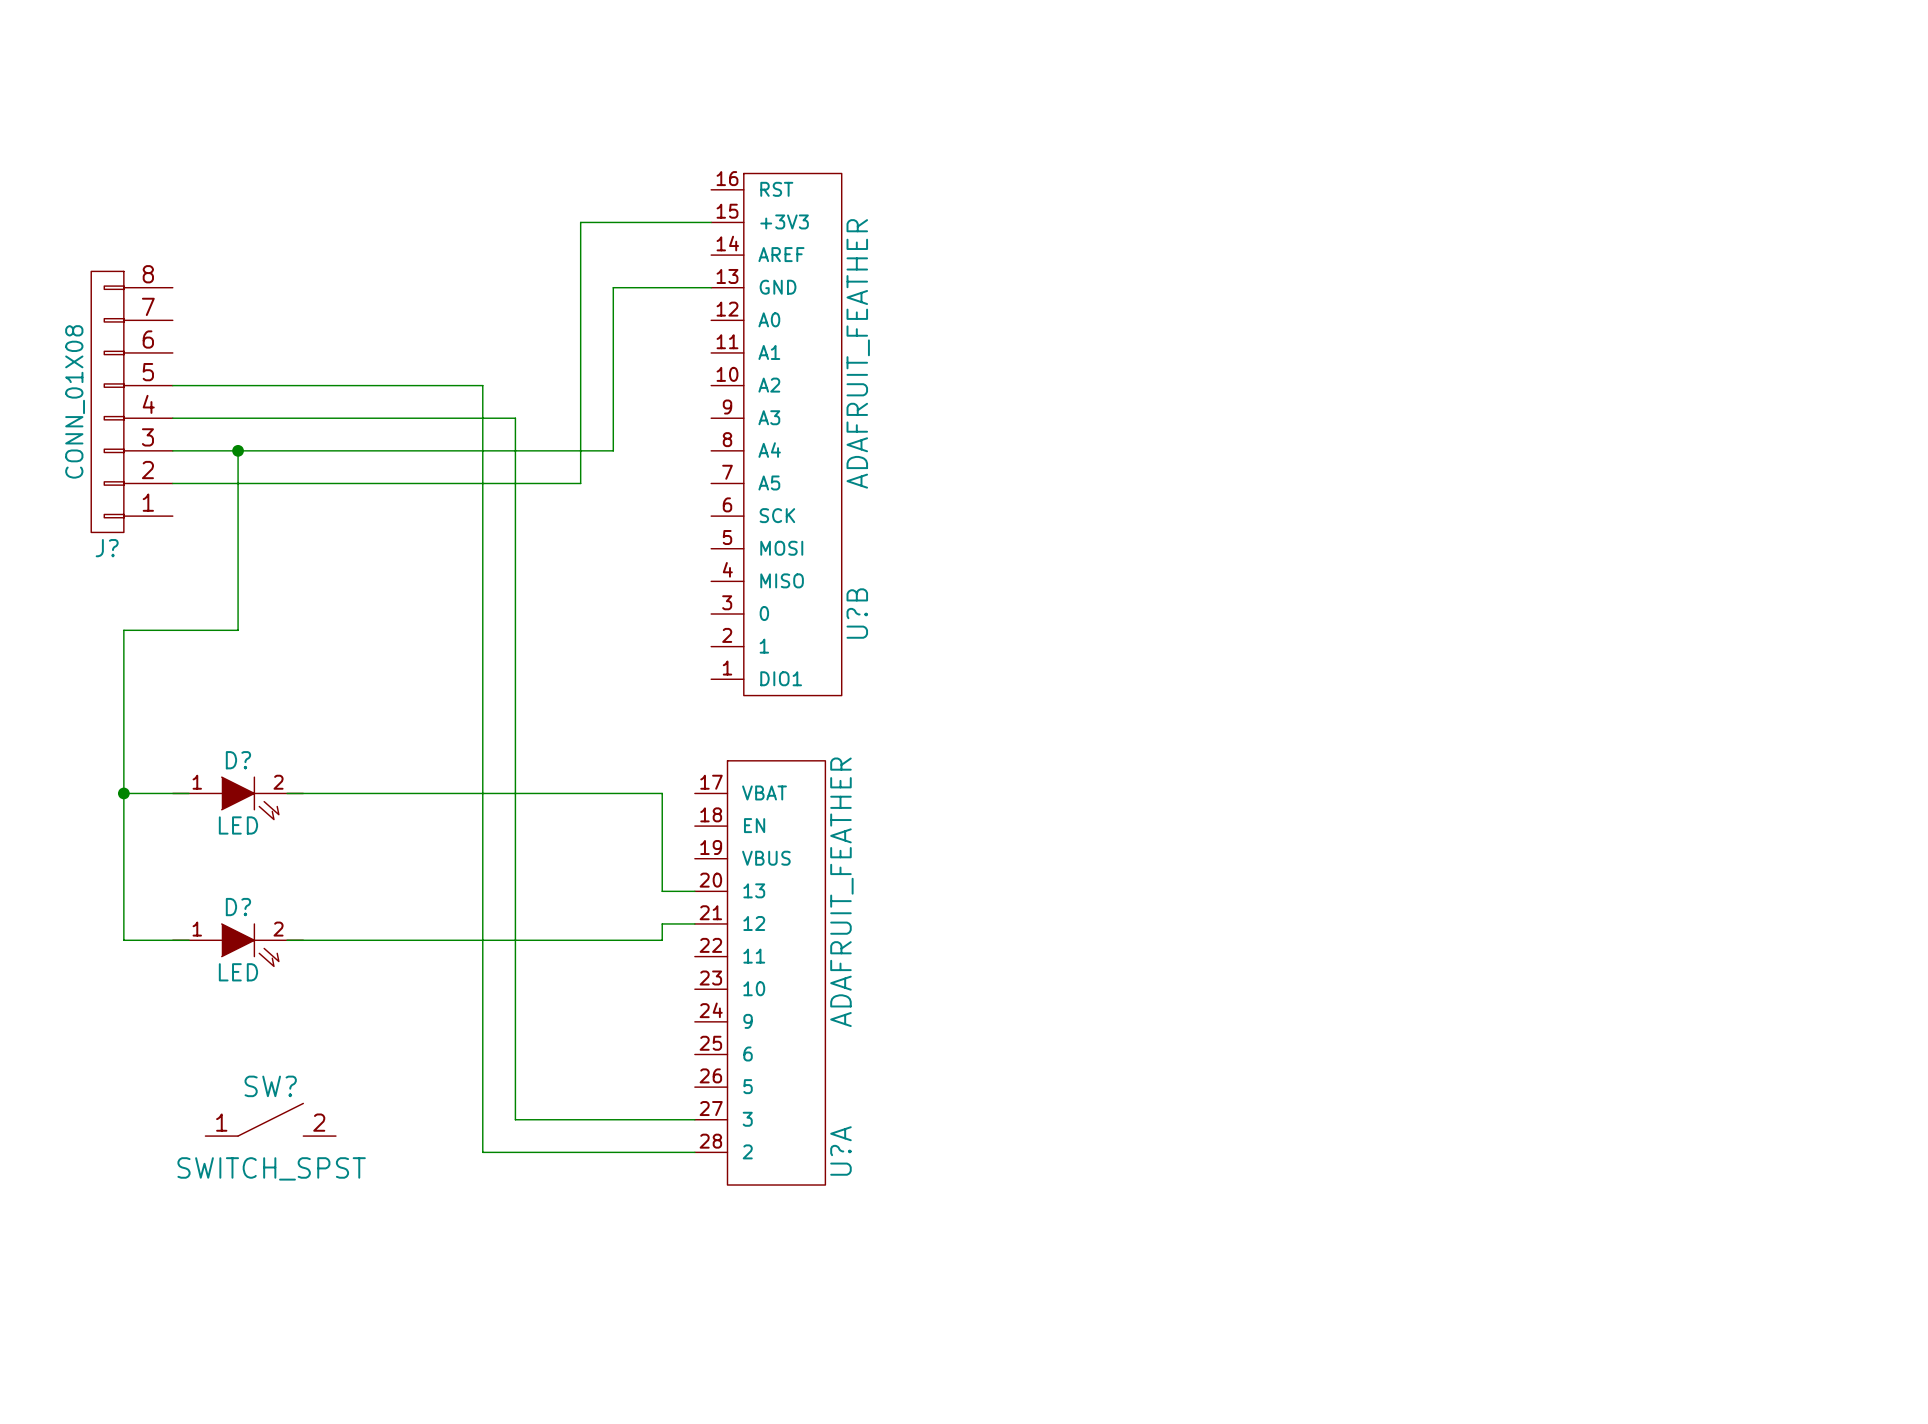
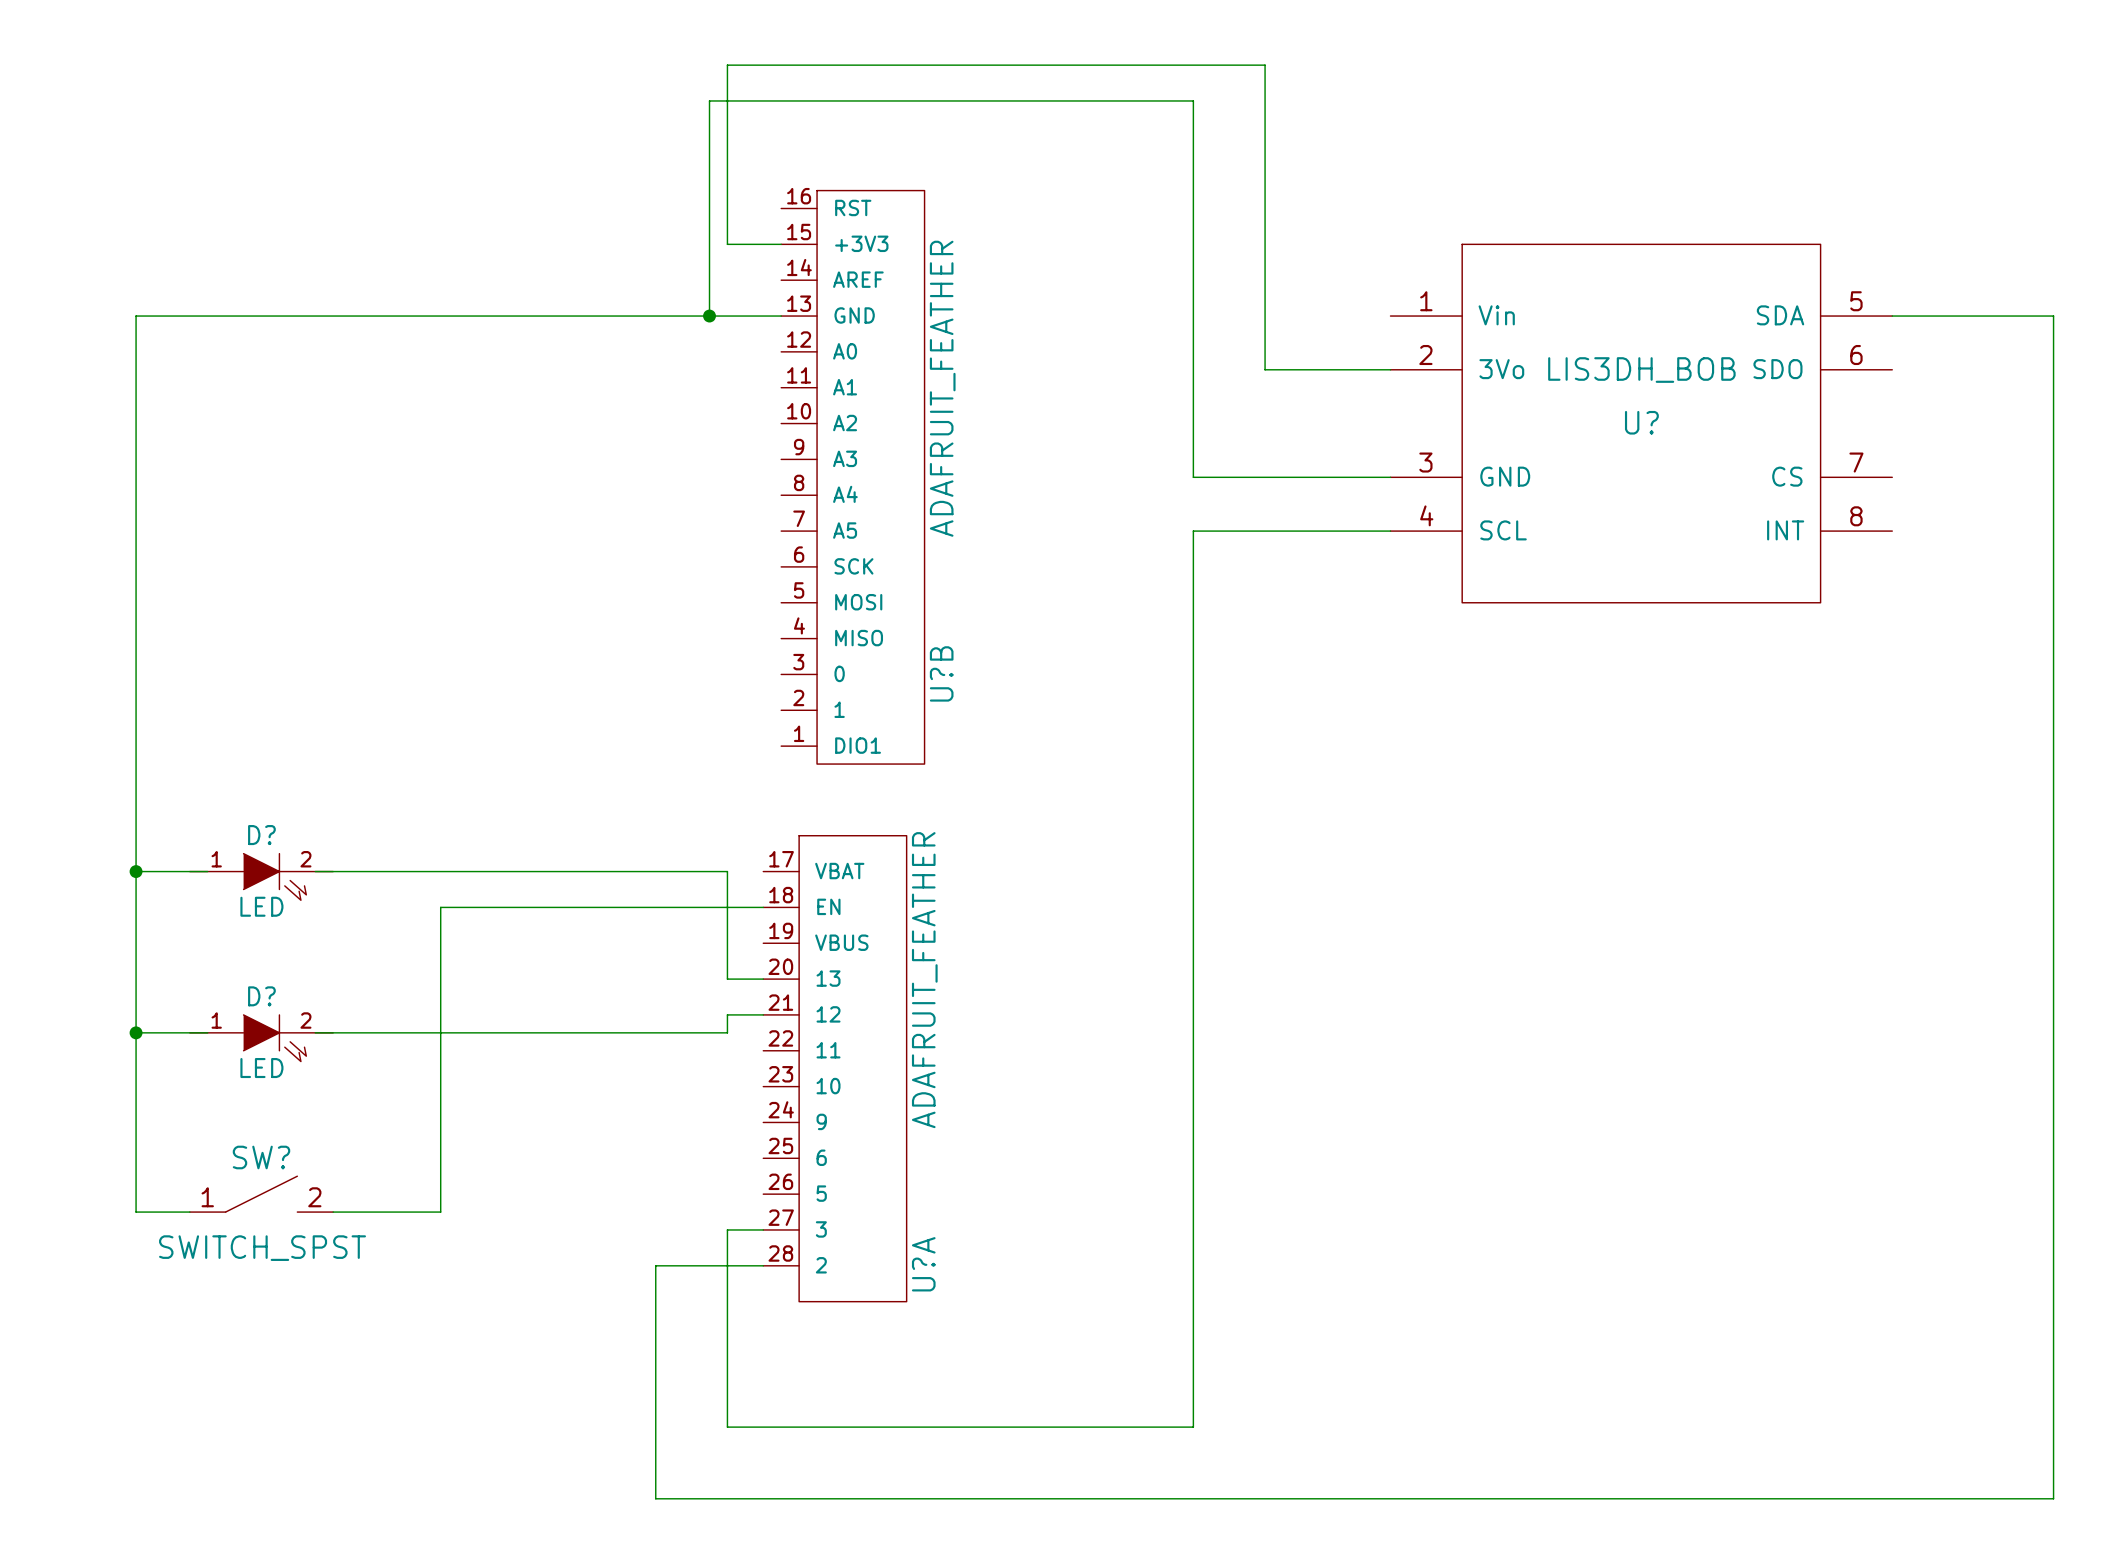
wire: (662, 222) (580, 222) (580, 483) (172, 483) -> (727, 244) (727, 65) (1265, 65) (1265, 369) (1390, 369)
wire: (613, 287) (613, 450) (172, 450) -> (673, 316) (136, 316) (136, 692)
wire: none -> (709, 316) (709, 100) (1193, 100) (1193, 477) (1390, 477)
junction: none -> (709, 316)
wire: (172, 385) (482, 385) (482, 1152) (596, 1152) -> (1892, 316) (2053, 316) (2053, 1498) (655, 1498) (655, 1265)
U?: none -> LIS3DH_BOB (1641, 423)
J?: CONN_01X08 (132, 401) -> none
wire: (172, 418) (515, 418) (515, 1119) (662, 1119) -> (1390, 531) (1193, 531) (1193, 1427) (727, 1427) (727, 1229)
wire: (238, 450) (238, 630) (123, 630) -> none
junction: (238, 450) -> none
wire: none -> (763, 907) (440, 907) (440, 1212) (333, 1212)
wire: none -> (136, 1032) (136, 1212) (189, 1212)
junction: none -> (136, 1032)
SW? position: (270, 1119) -> (261, 1194)

